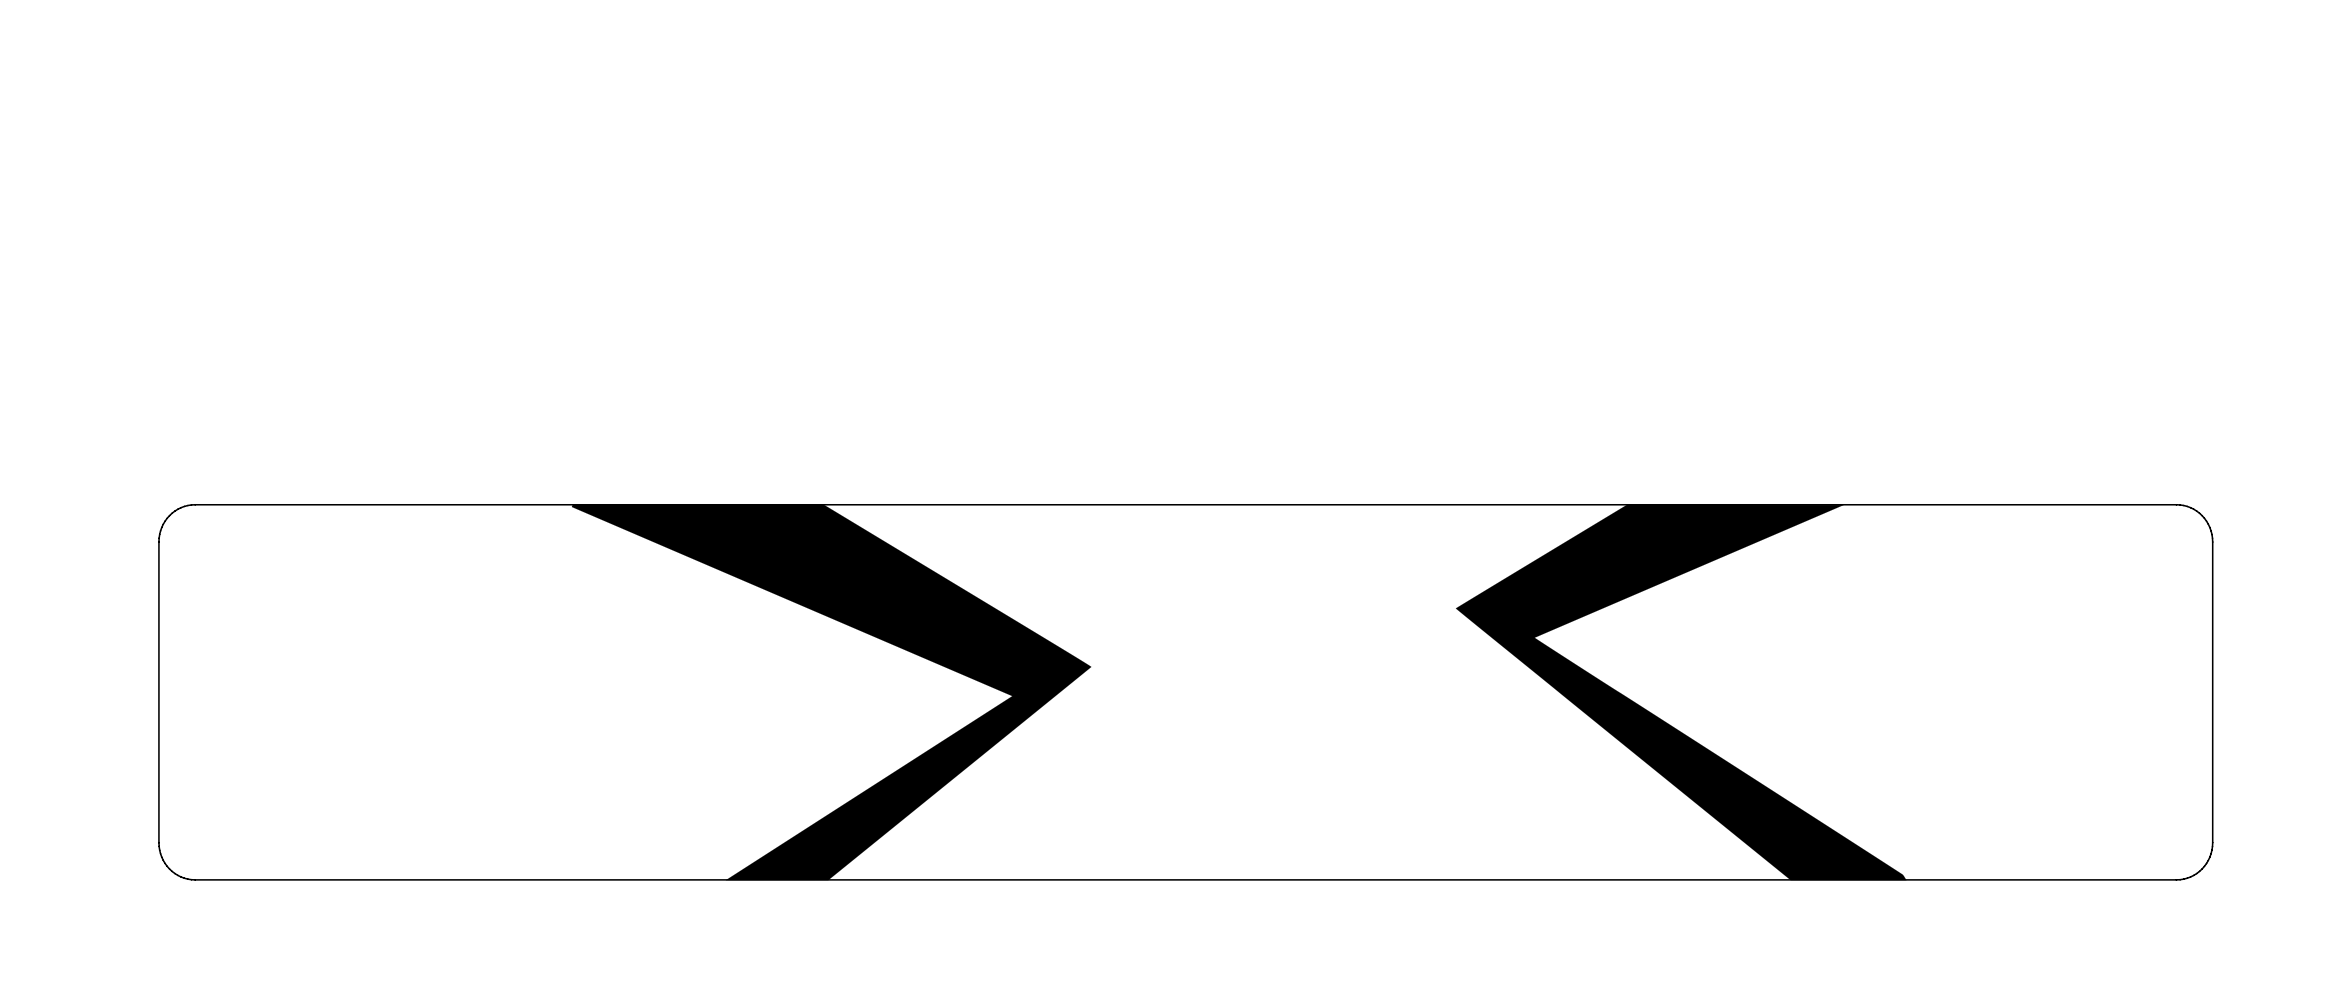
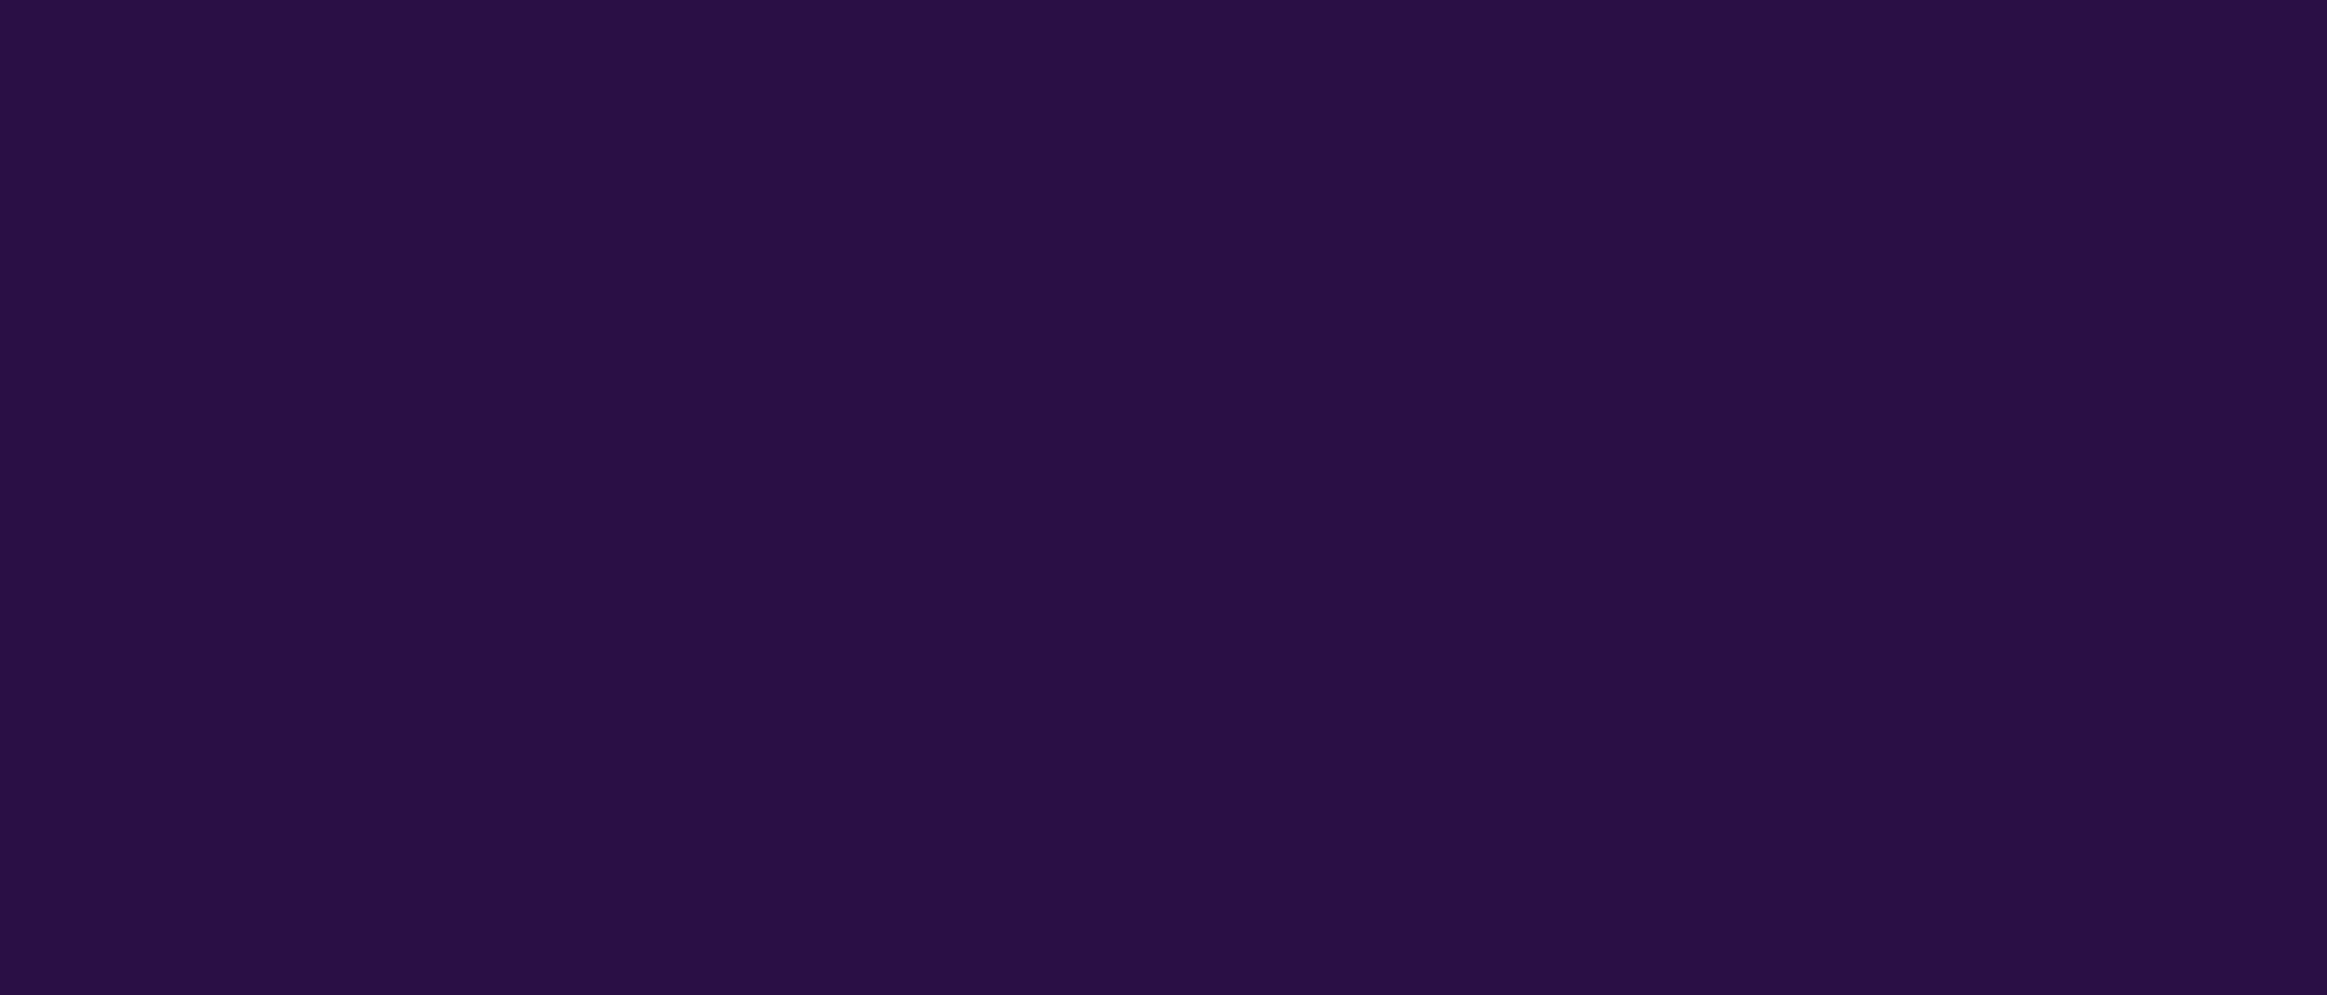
drawing: [158, 504, 2214, 881] -> none

